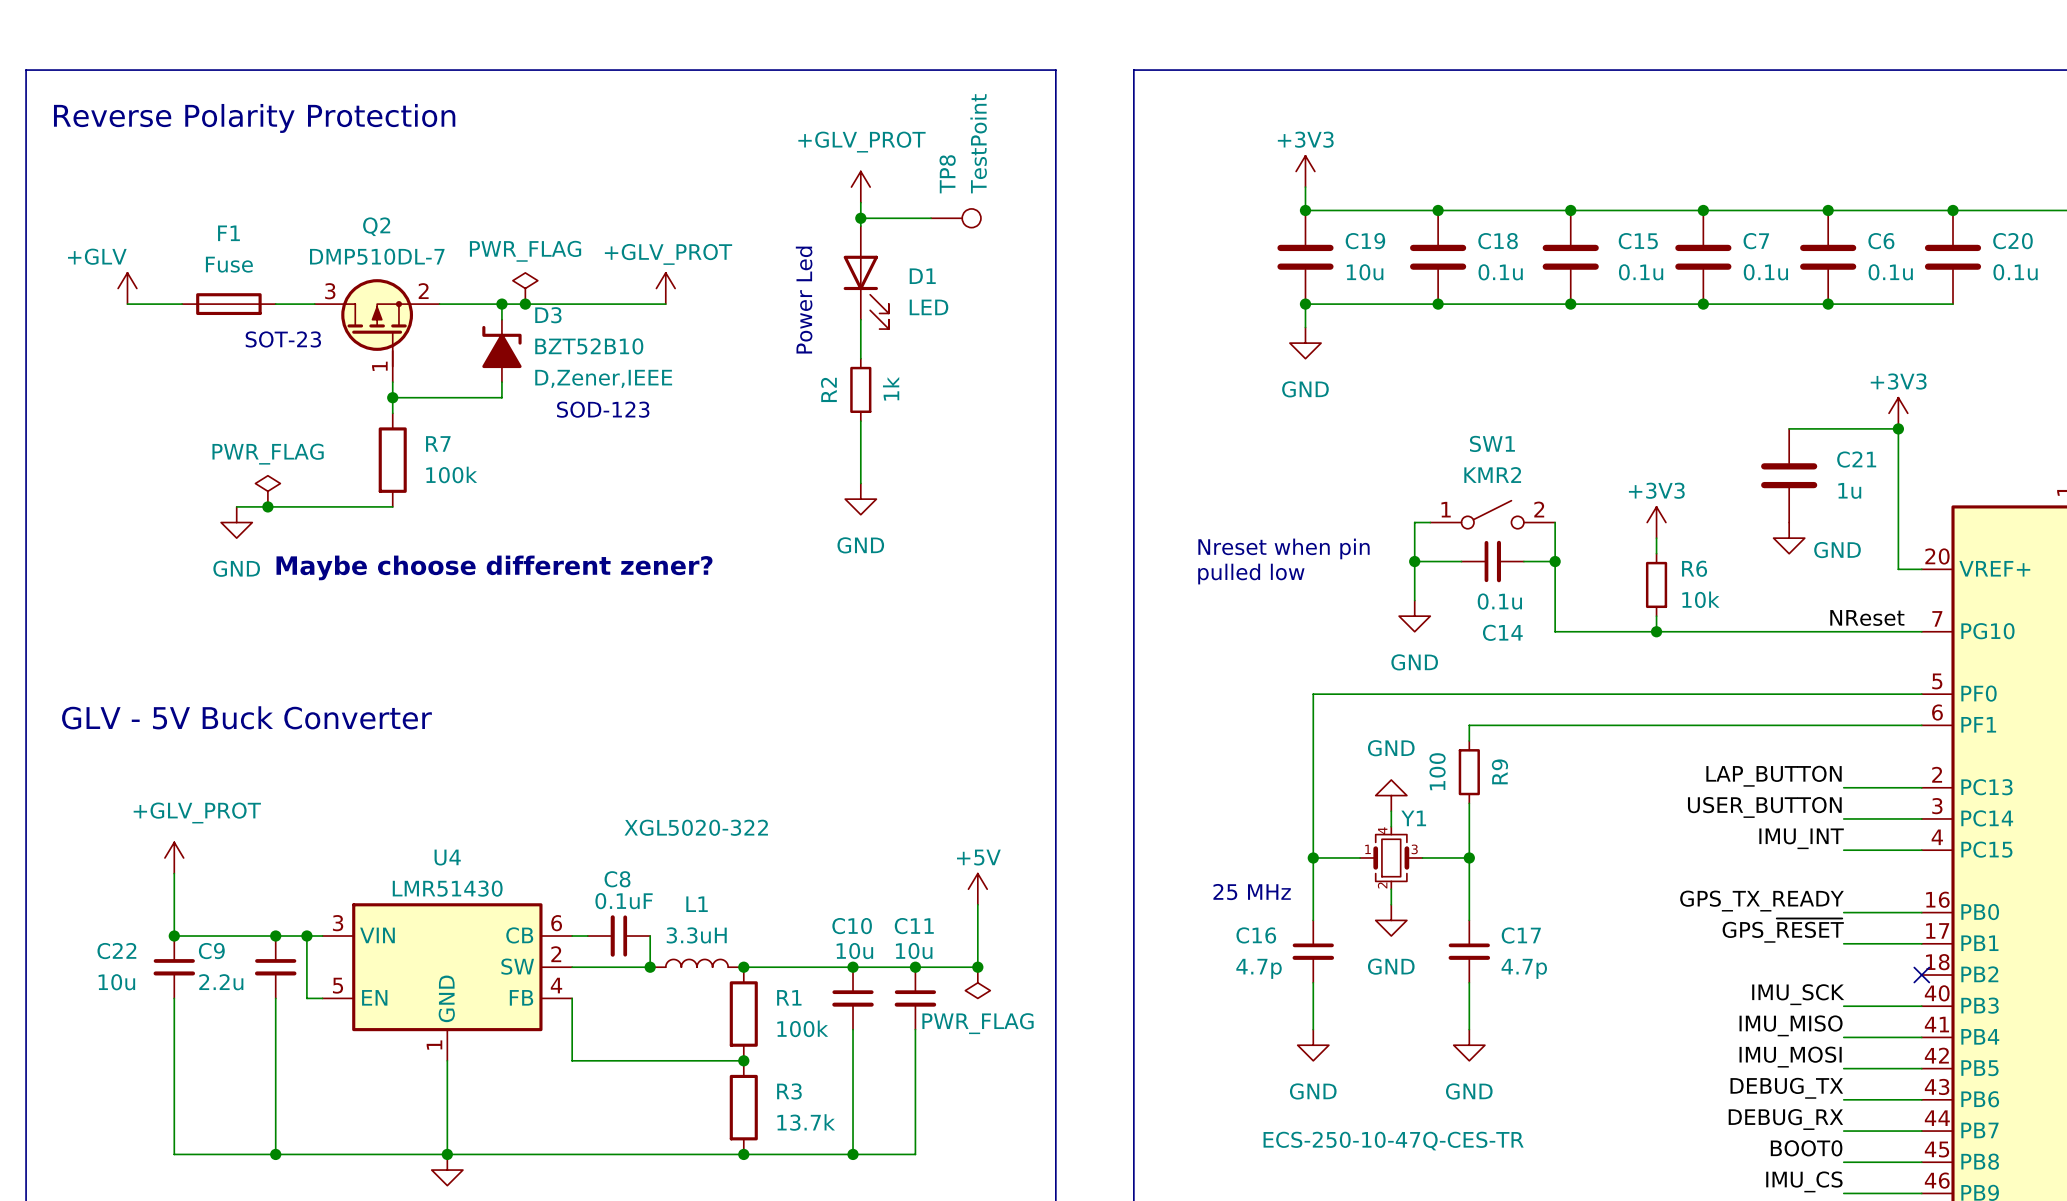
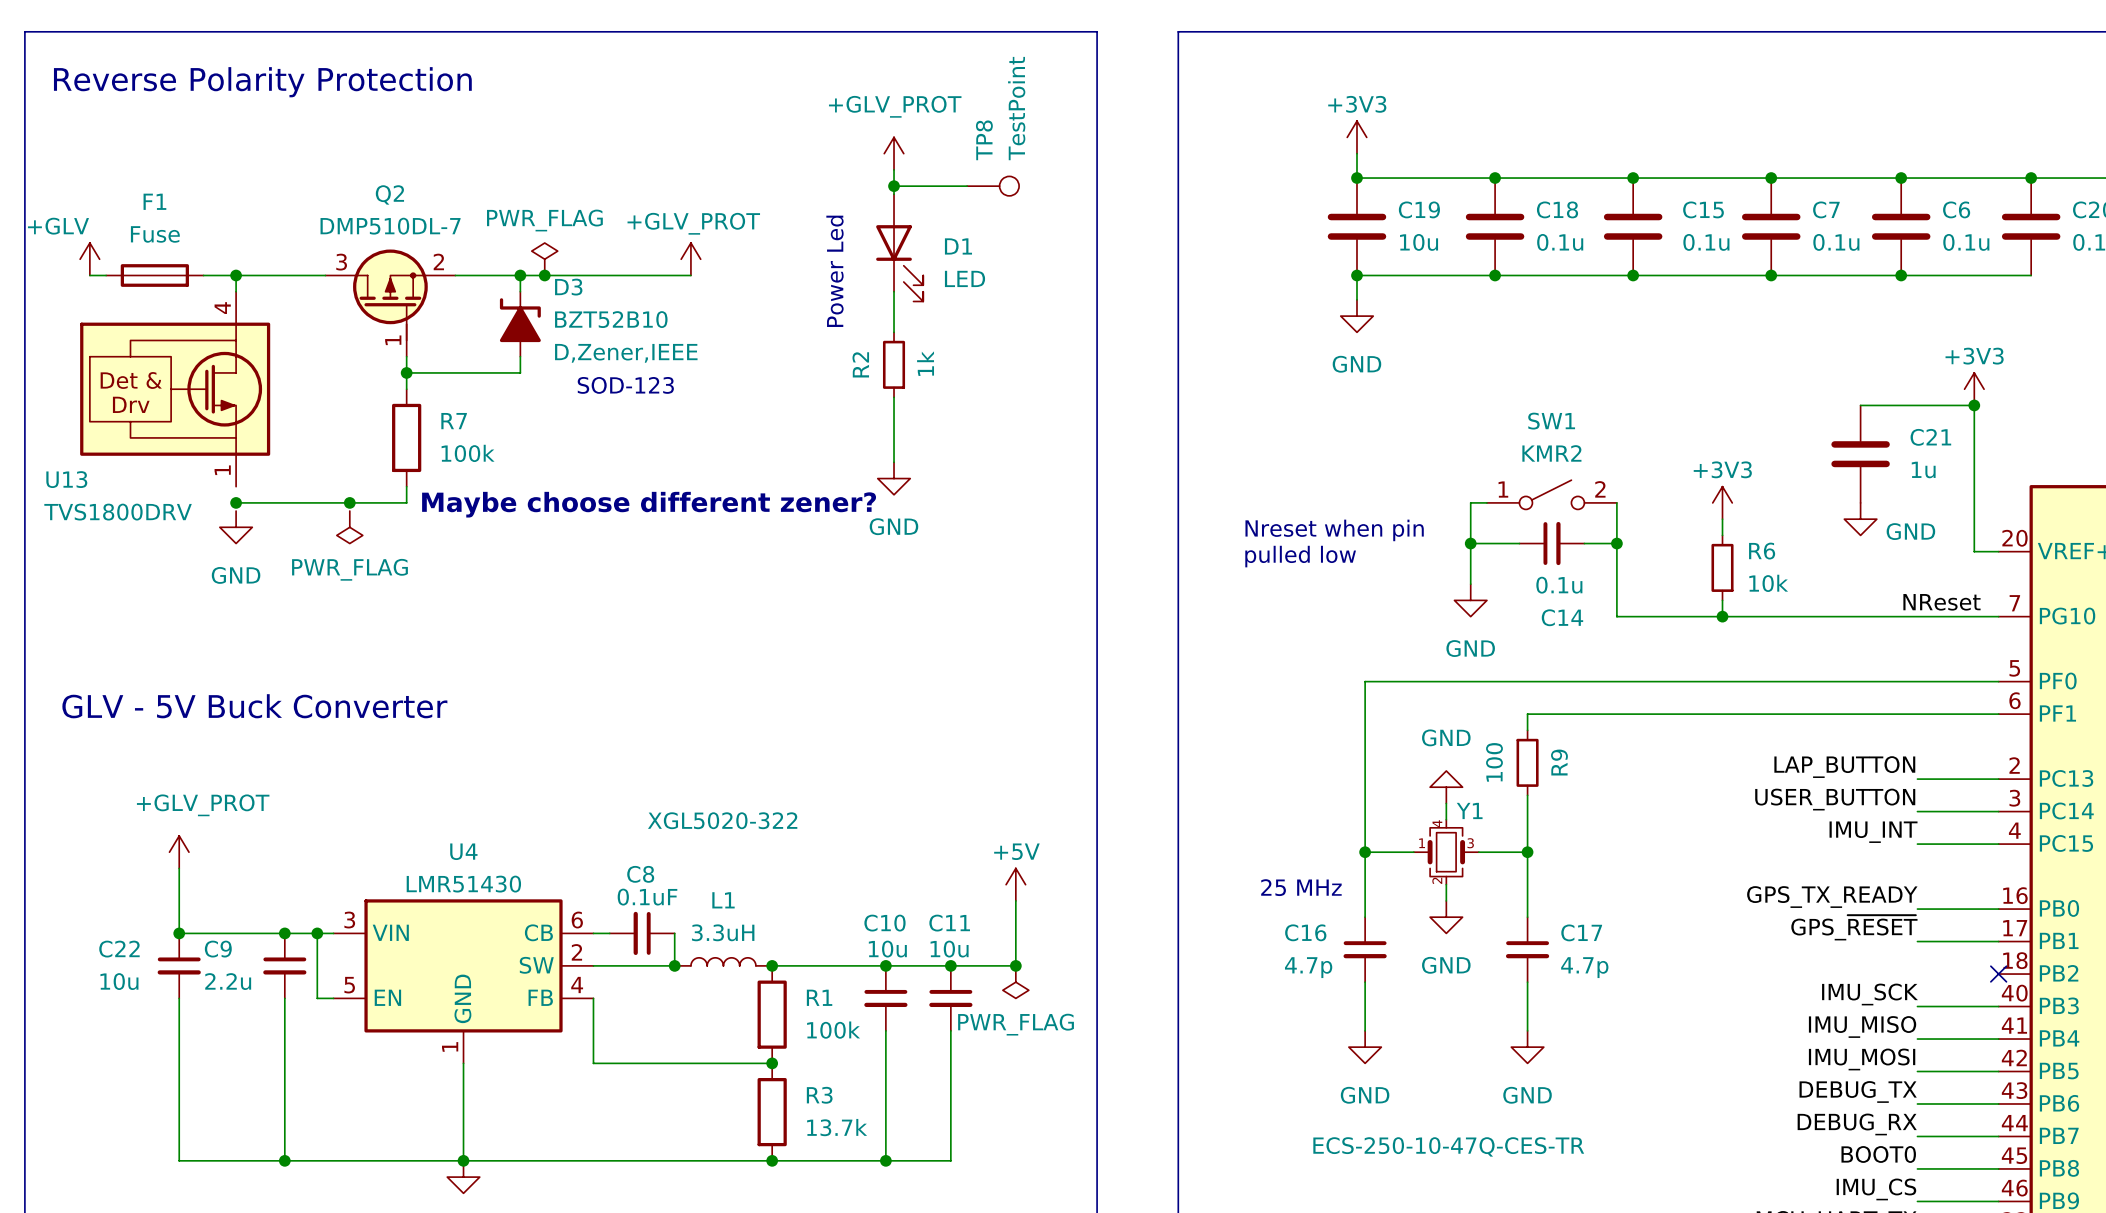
power symbol position: +GLV (127, 288) -> +GLV (89, 259)
wire: none -> (89, 275) (106, 275)
wire: none -> (236, 275) (236, 291)
junction: none -> (236, 275)
F1 position: (228, 304) -> (154, 275)
text: SOT-23 (283, 339) -> none
U13: none -> TVS1800DRV (175, 389)
power symbol rotation: 0° (267, 491) -> 180° (349, 527)
power symbol position: PWR_FLAG (267, 491) -> PWR_FLAG (349, 527)
wire: (236, 506) (392, 506) -> (236, 502) (406, 502) (406, 486)
junction: (267, 506) -> none
junction: none -> (236, 502)
power symbol position: GND (236, 522) -> GND (236, 527)
junction: none -> (349, 502)
text position: Maybe choose different zener? (494, 567) -> Maybe choose different zener? (649, 504)

